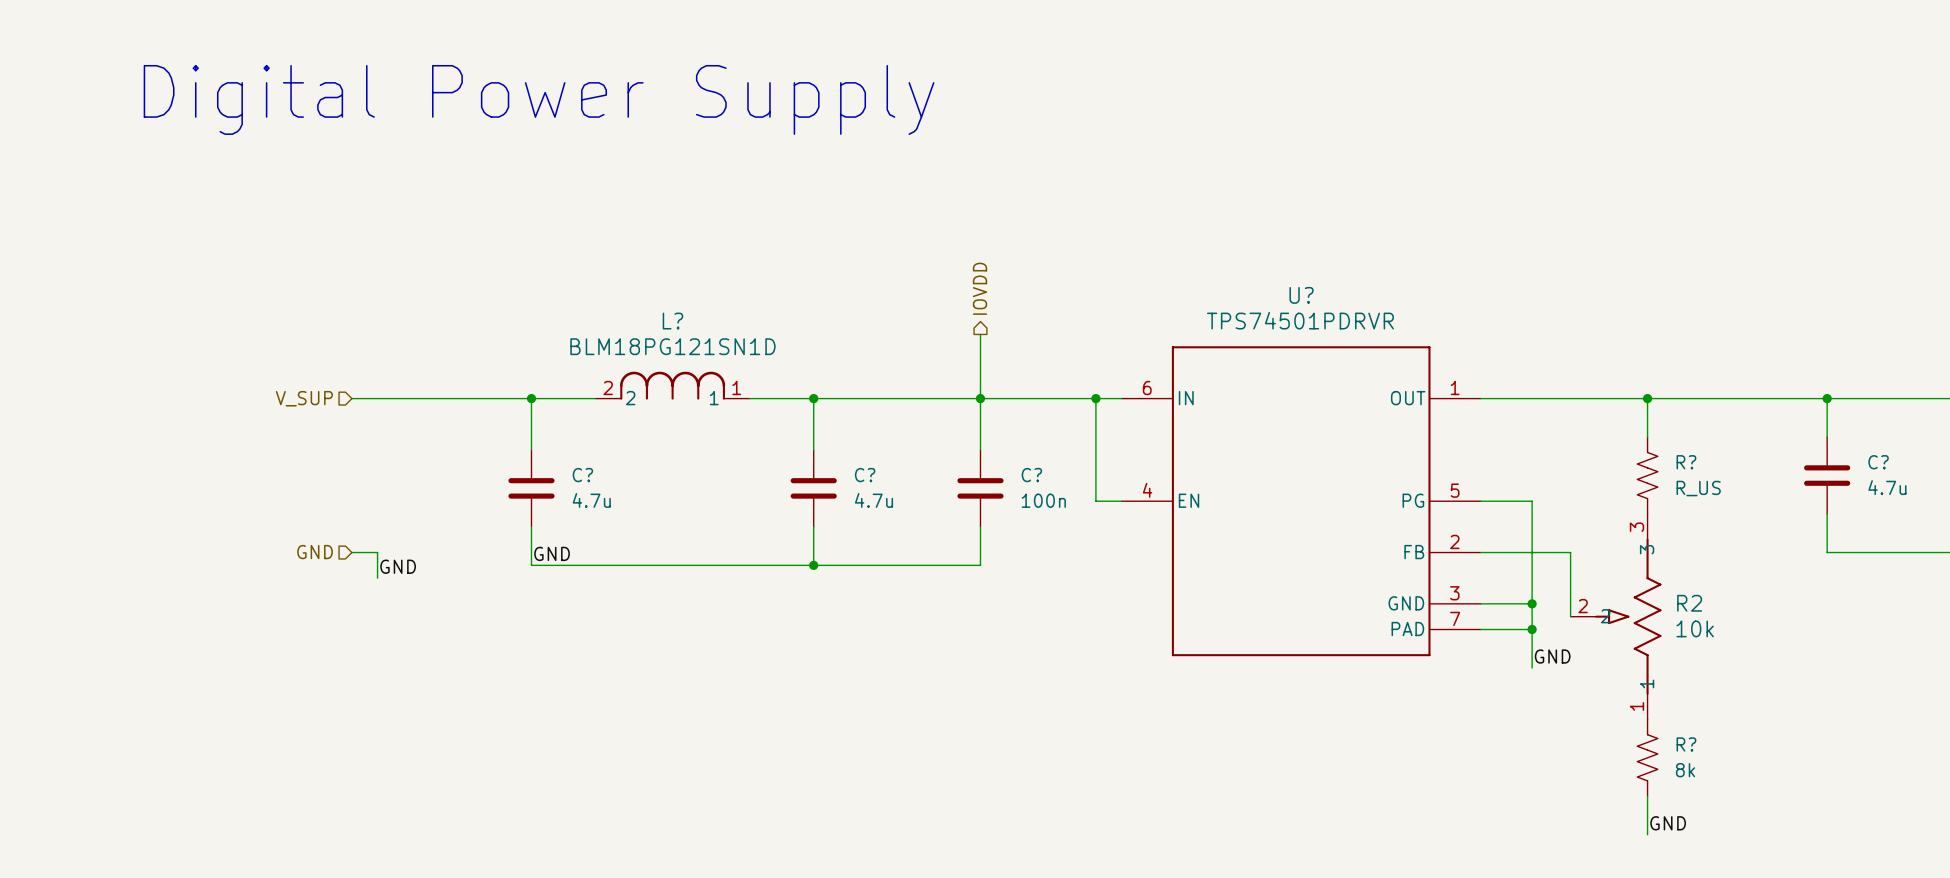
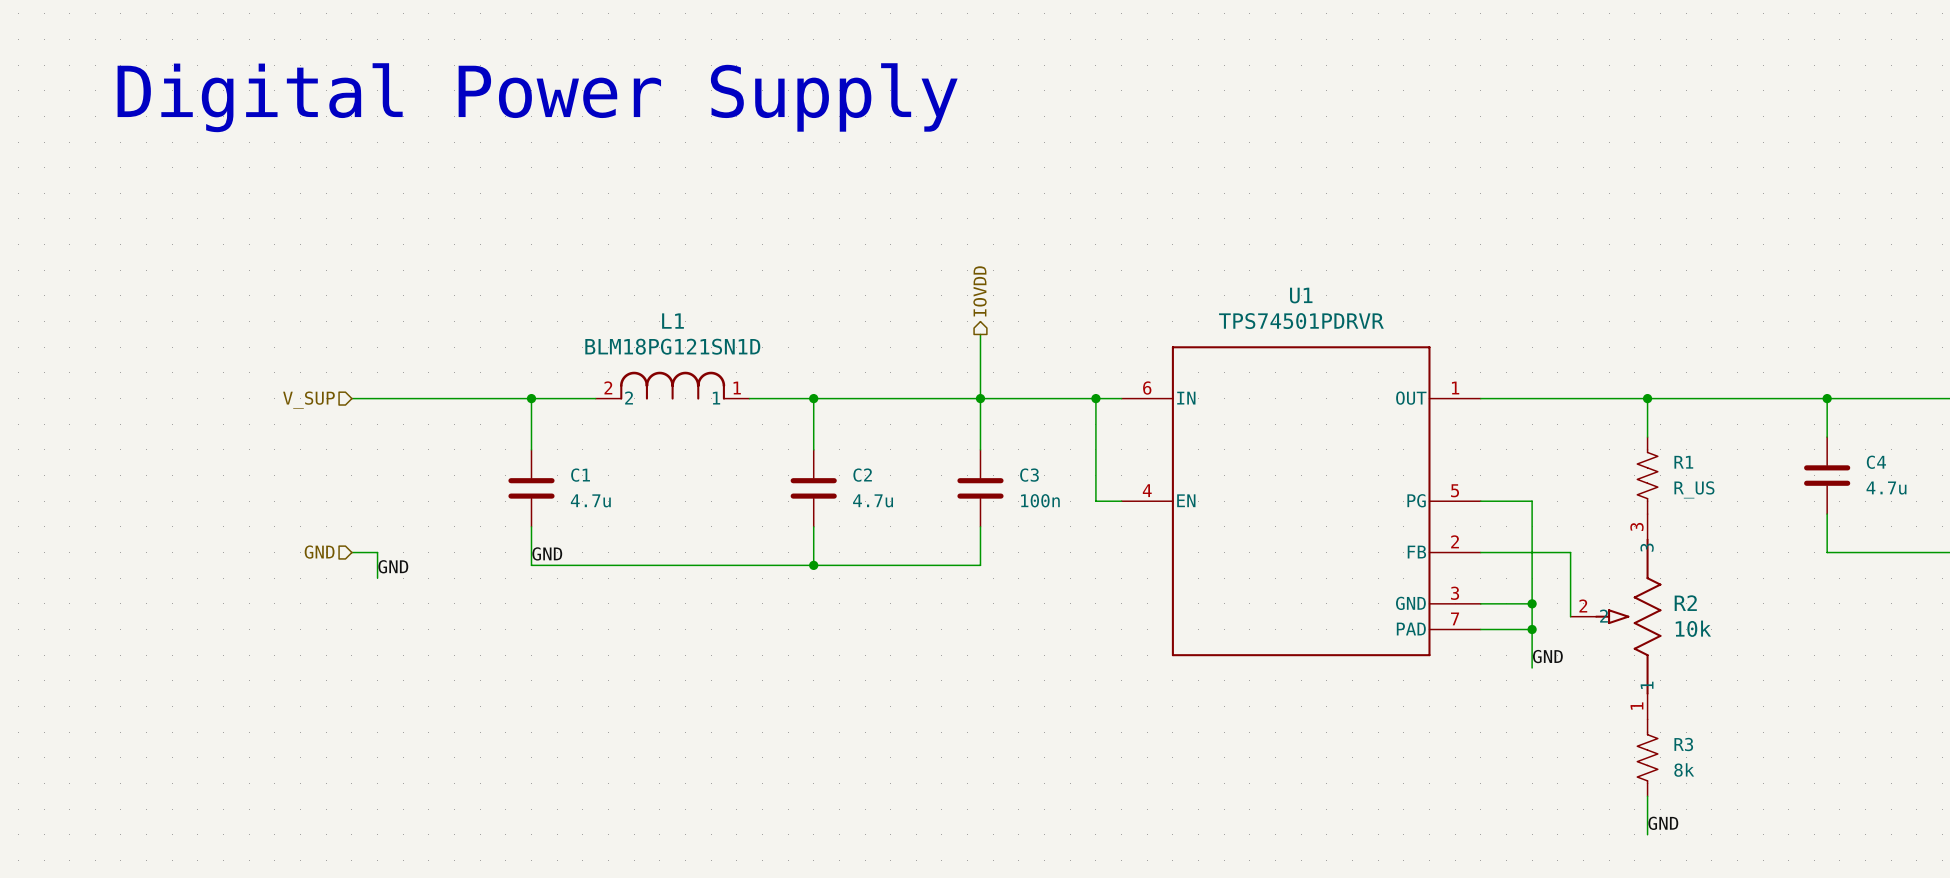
U? name: U? (1301, 295) -> U1 (1301, 295)
L? name: L? (672, 321) -> L1 (672, 321)
R? name: R? (1686, 462) -> R1 (1683, 462)
C? name: C? (1878, 462) -> C4 (1876, 462)
C? name: C? (582, 475) -> C1 (580, 475)
C? name: C? (865, 475) -> C2 (862, 475)
C? name: C? (1031, 475) -> C3 (1029, 475)
R? name: R? (1686, 744) -> R3 (1683, 744)

